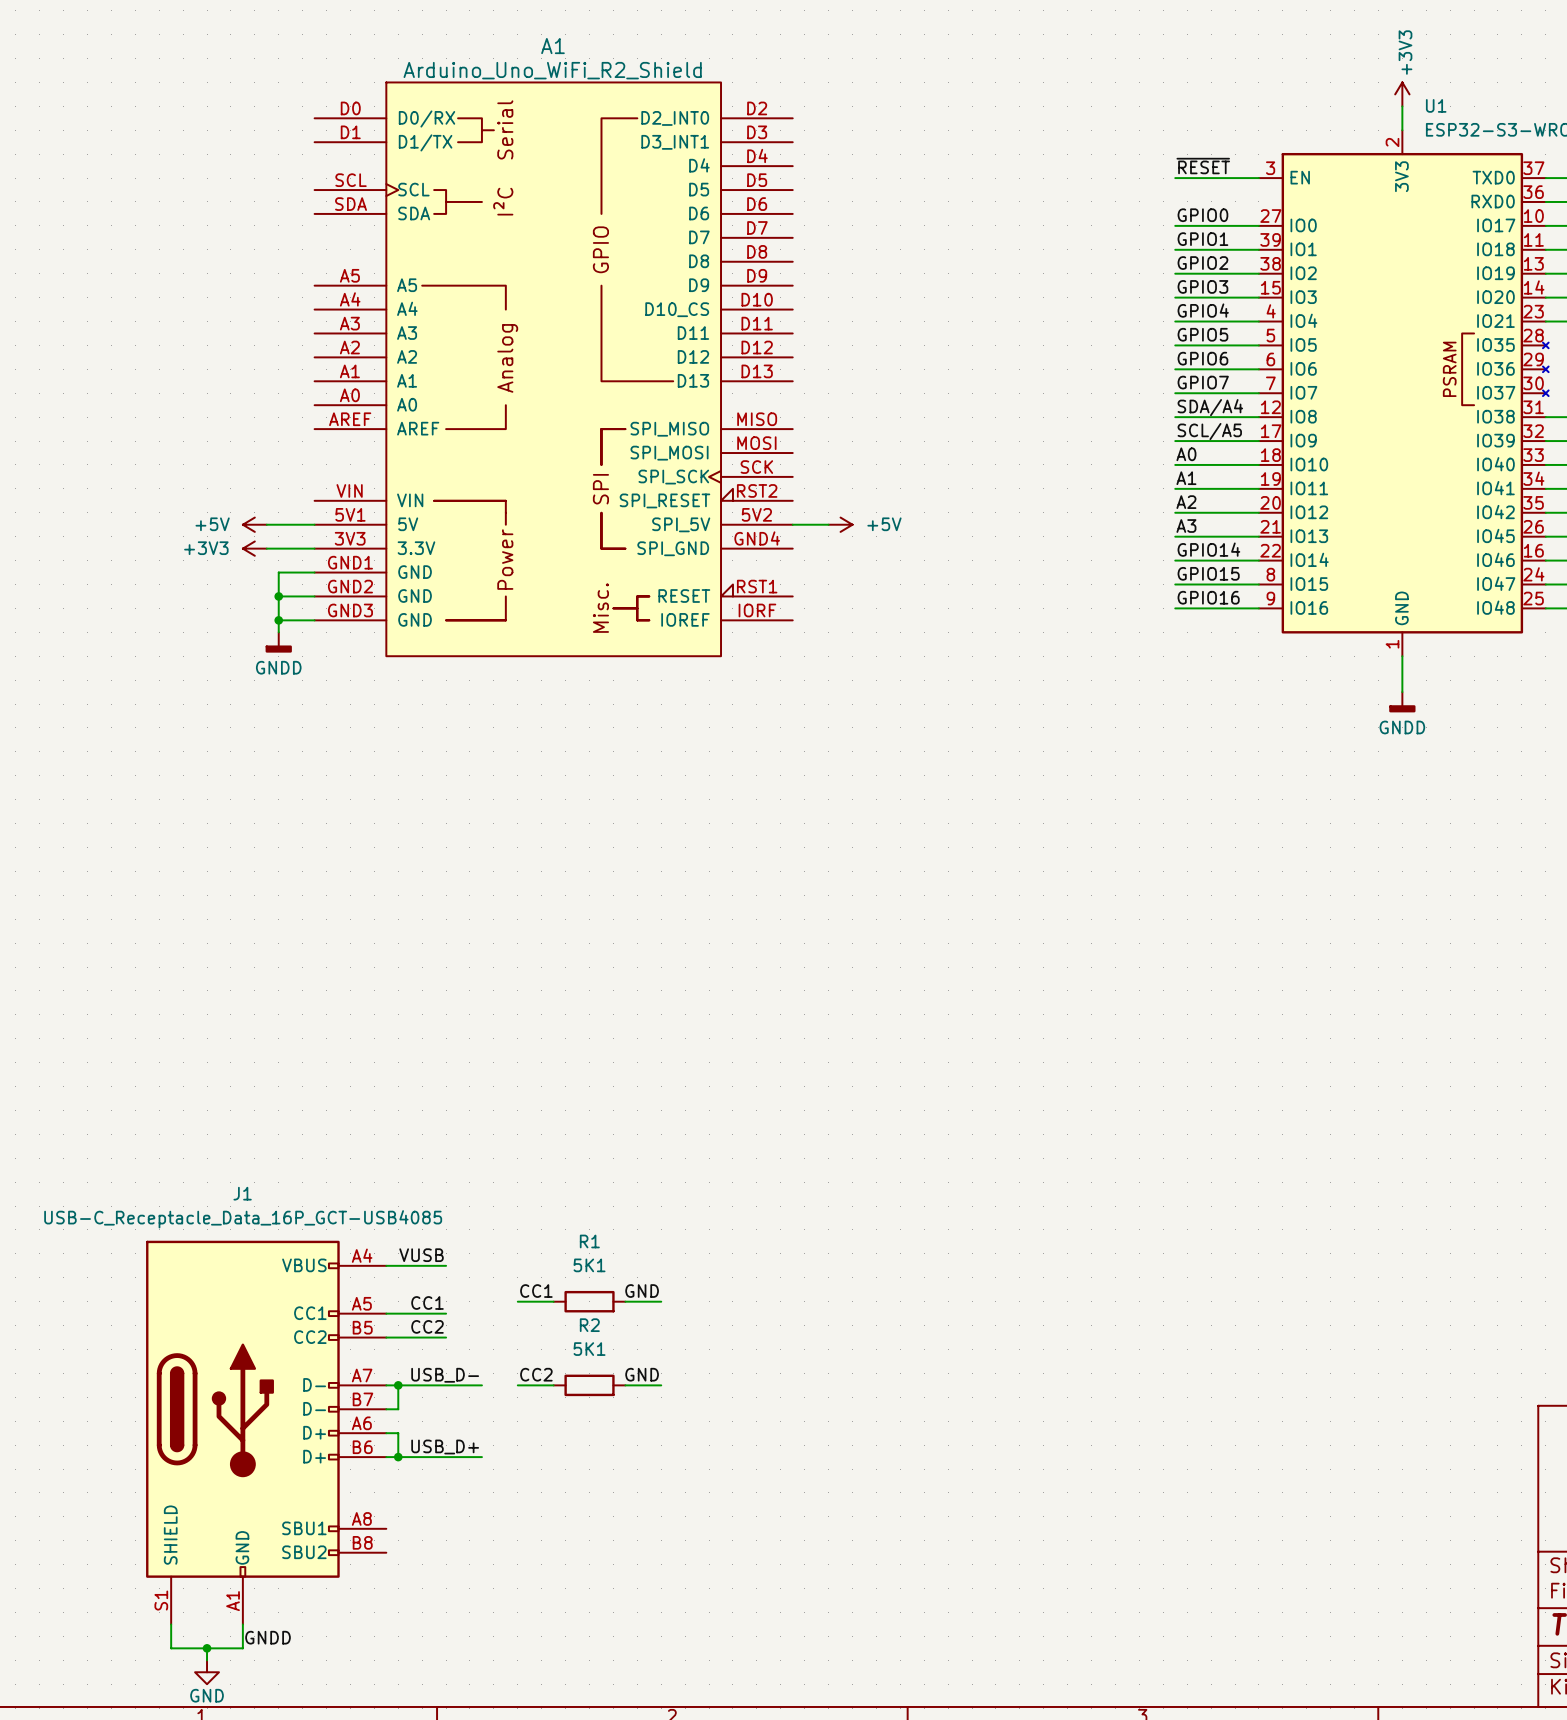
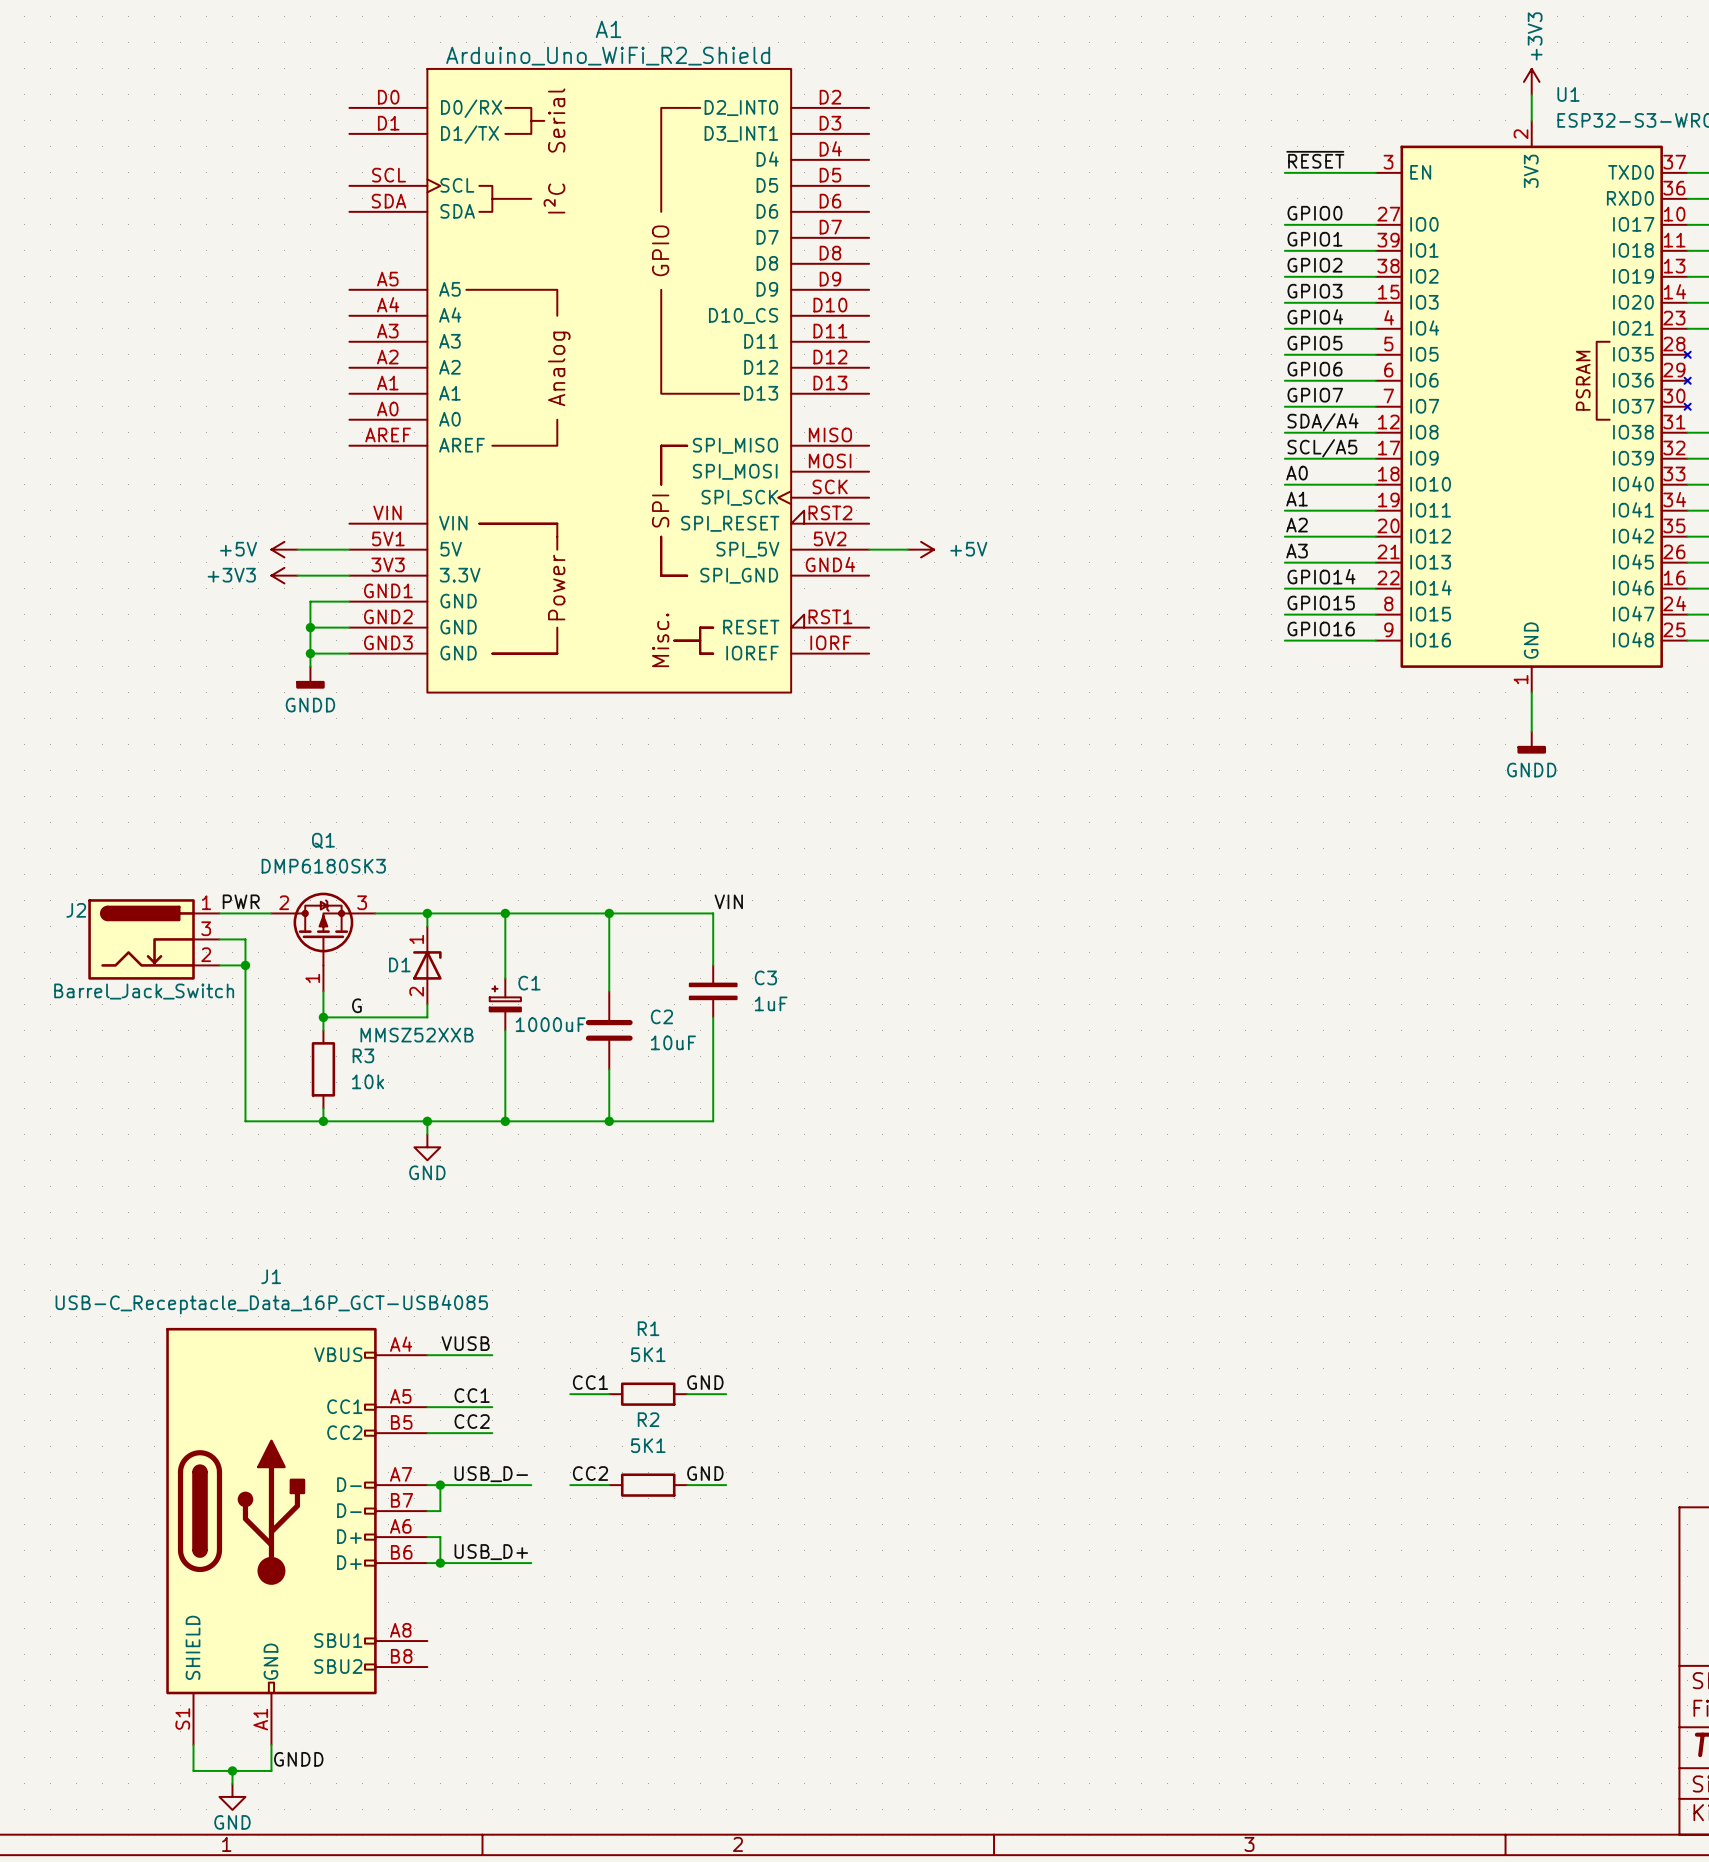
label: none -> PWR (241, 901)
label: none -> VIN (728, 901)
wire: none -> (219, 913) (271, 913)
wire: none -> (375, 913) (713, 913) (713, 965)
wire: none -> (427, 913) (427, 926)
junction: none -> (427, 913)
wire: none -> (505, 913) (505, 978)
junction: none -> (505, 913)
wire: none -> (609, 913) (609, 991)
junction: none -> (609, 913)
J2: none -> Barrel_Jack_Switch (153, 939)
wire: none -> (219, 939) (245, 939) (245, 1121) (713, 1121) (713, 1017)
Q1: none -> DMP6180SK3 (323, 942)
wire: none -> (219, 965) (245, 965)
junction: none -> (245, 965)
D1: none -> MMSZ52XXB (427, 965)
wire: none -> (323, 991) (323, 1030)
C3: none -> 1uF (713, 991)
wire: none -> (427, 1004) (427, 1017) (323, 1017)
C1: none -> 1000uF (505, 1004)
label: none -> G (356, 1005)
junction: none -> (323, 1017)
wire: none -> (505, 1030) (505, 1121)
C2: none -> 10uF (609, 1030)
R3: none -> 10k (323, 1069)
wire: none -> (609, 1069) (609, 1121)
wire: none -> (323, 1108) (323, 1121)
junction: none -> (323, 1121)
wire: none -> (427, 1121) (427, 1134)
junction: none -> (427, 1121)
junction: none -> (505, 1121)
junction: none -> (609, 1121)
power symbol: none -> GND (427, 1147)

